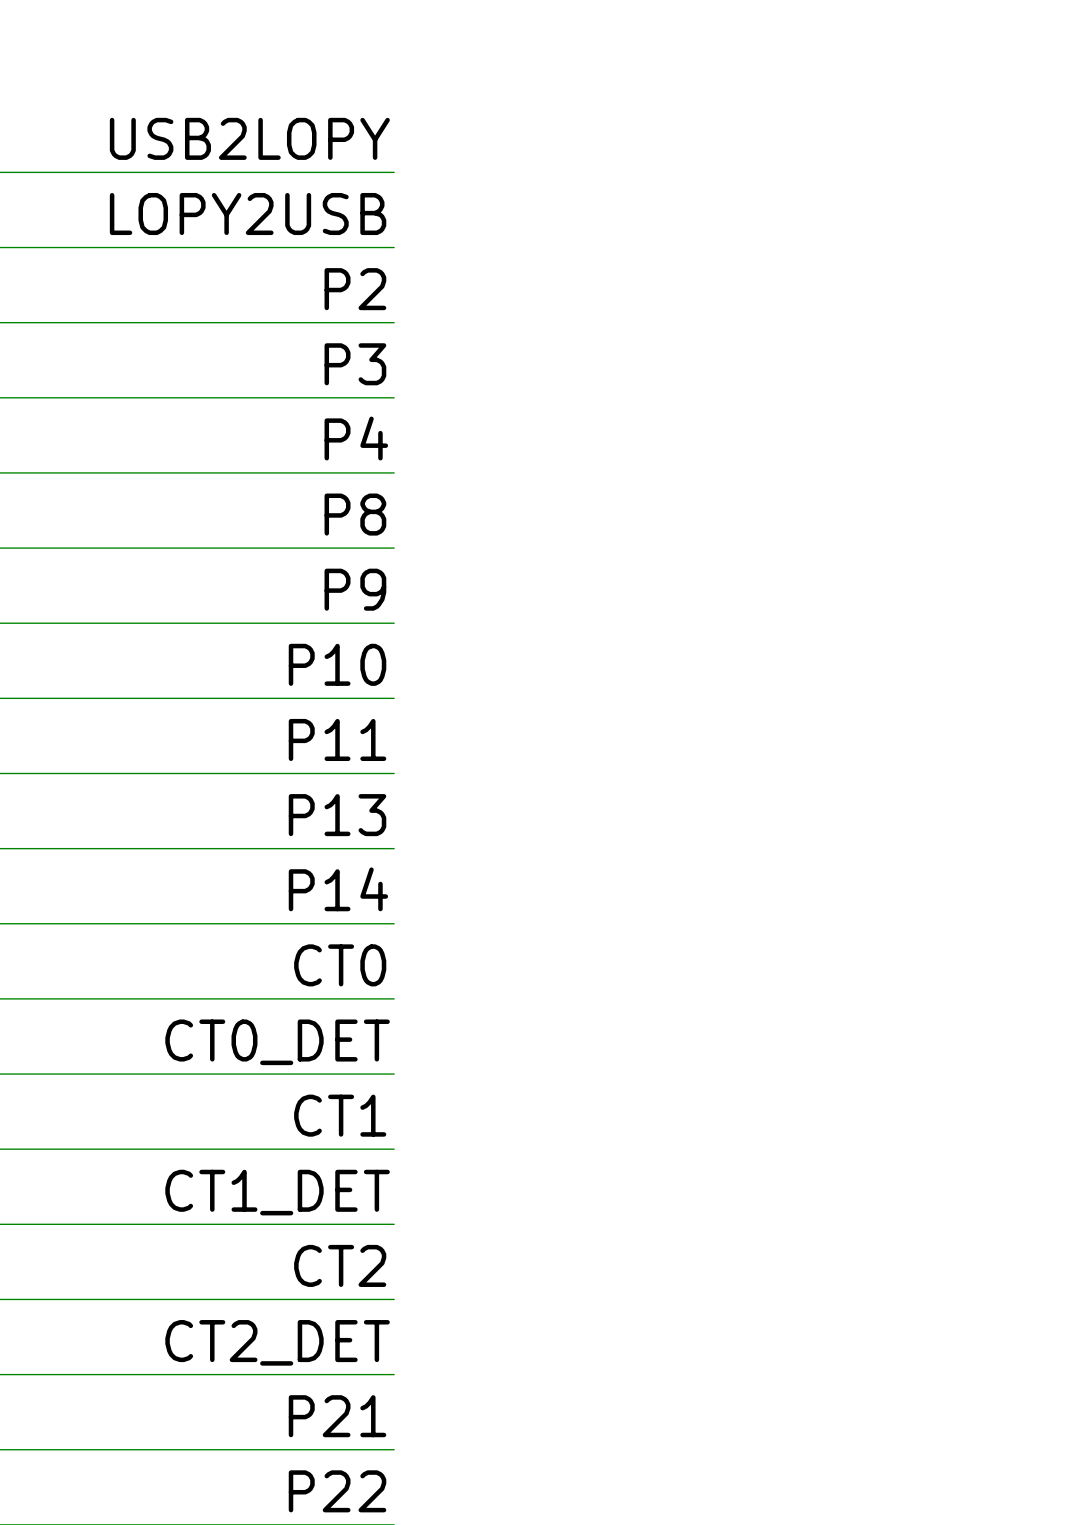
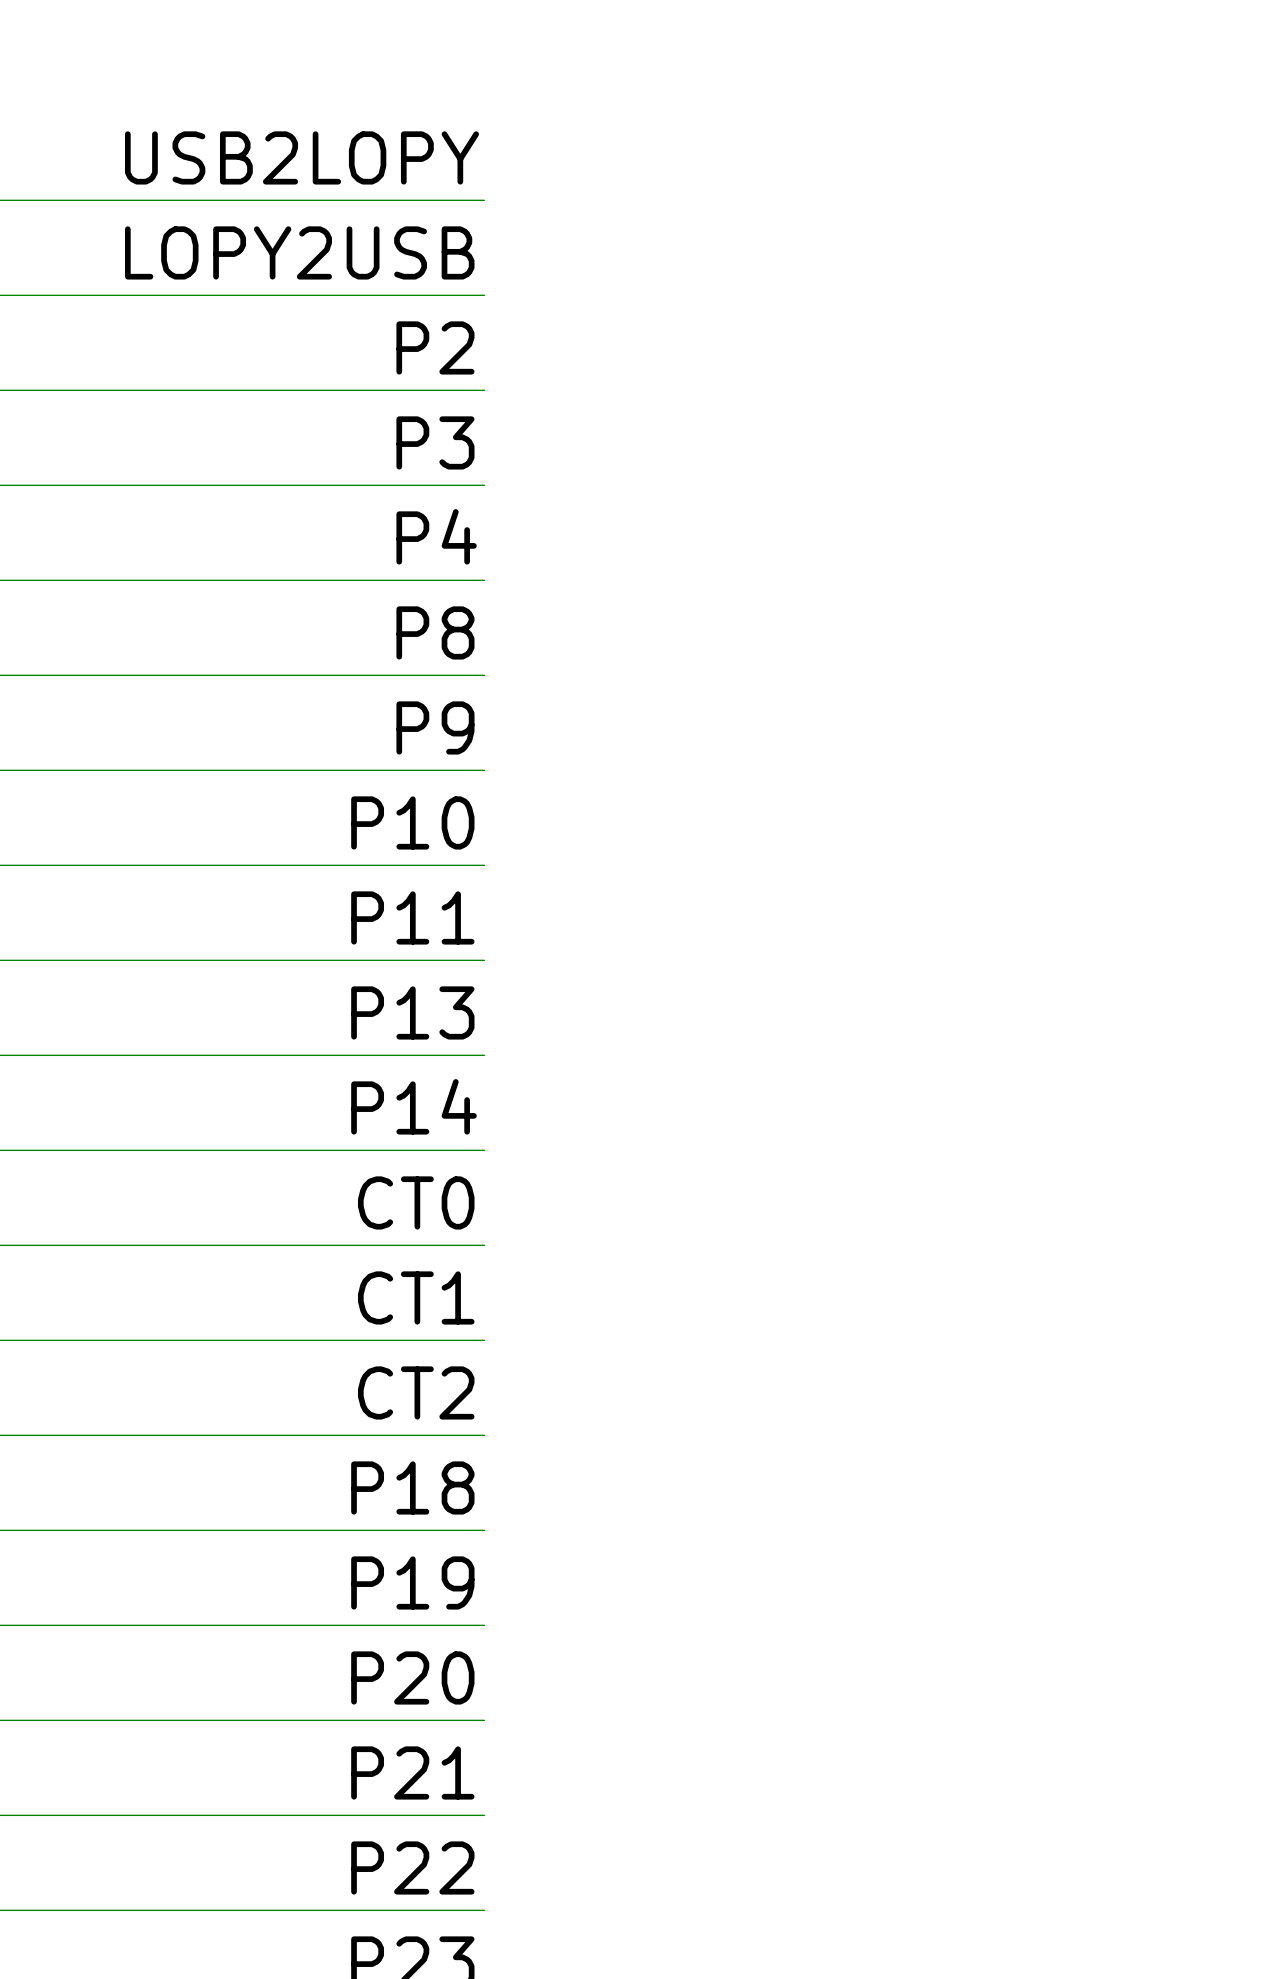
label: CT0_DET (277, 1042) -> CT1 (416, 1297)
label: CT1 (340, 1115) -> CT2 (416, 1392)
label: CT1_DET (277, 1192) -> P18 (412, 1487)
label: CT2 (340, 1265) -> P19 (412, 1582)
label: CT2_DET (277, 1342) -> P20 (412, 1677)

